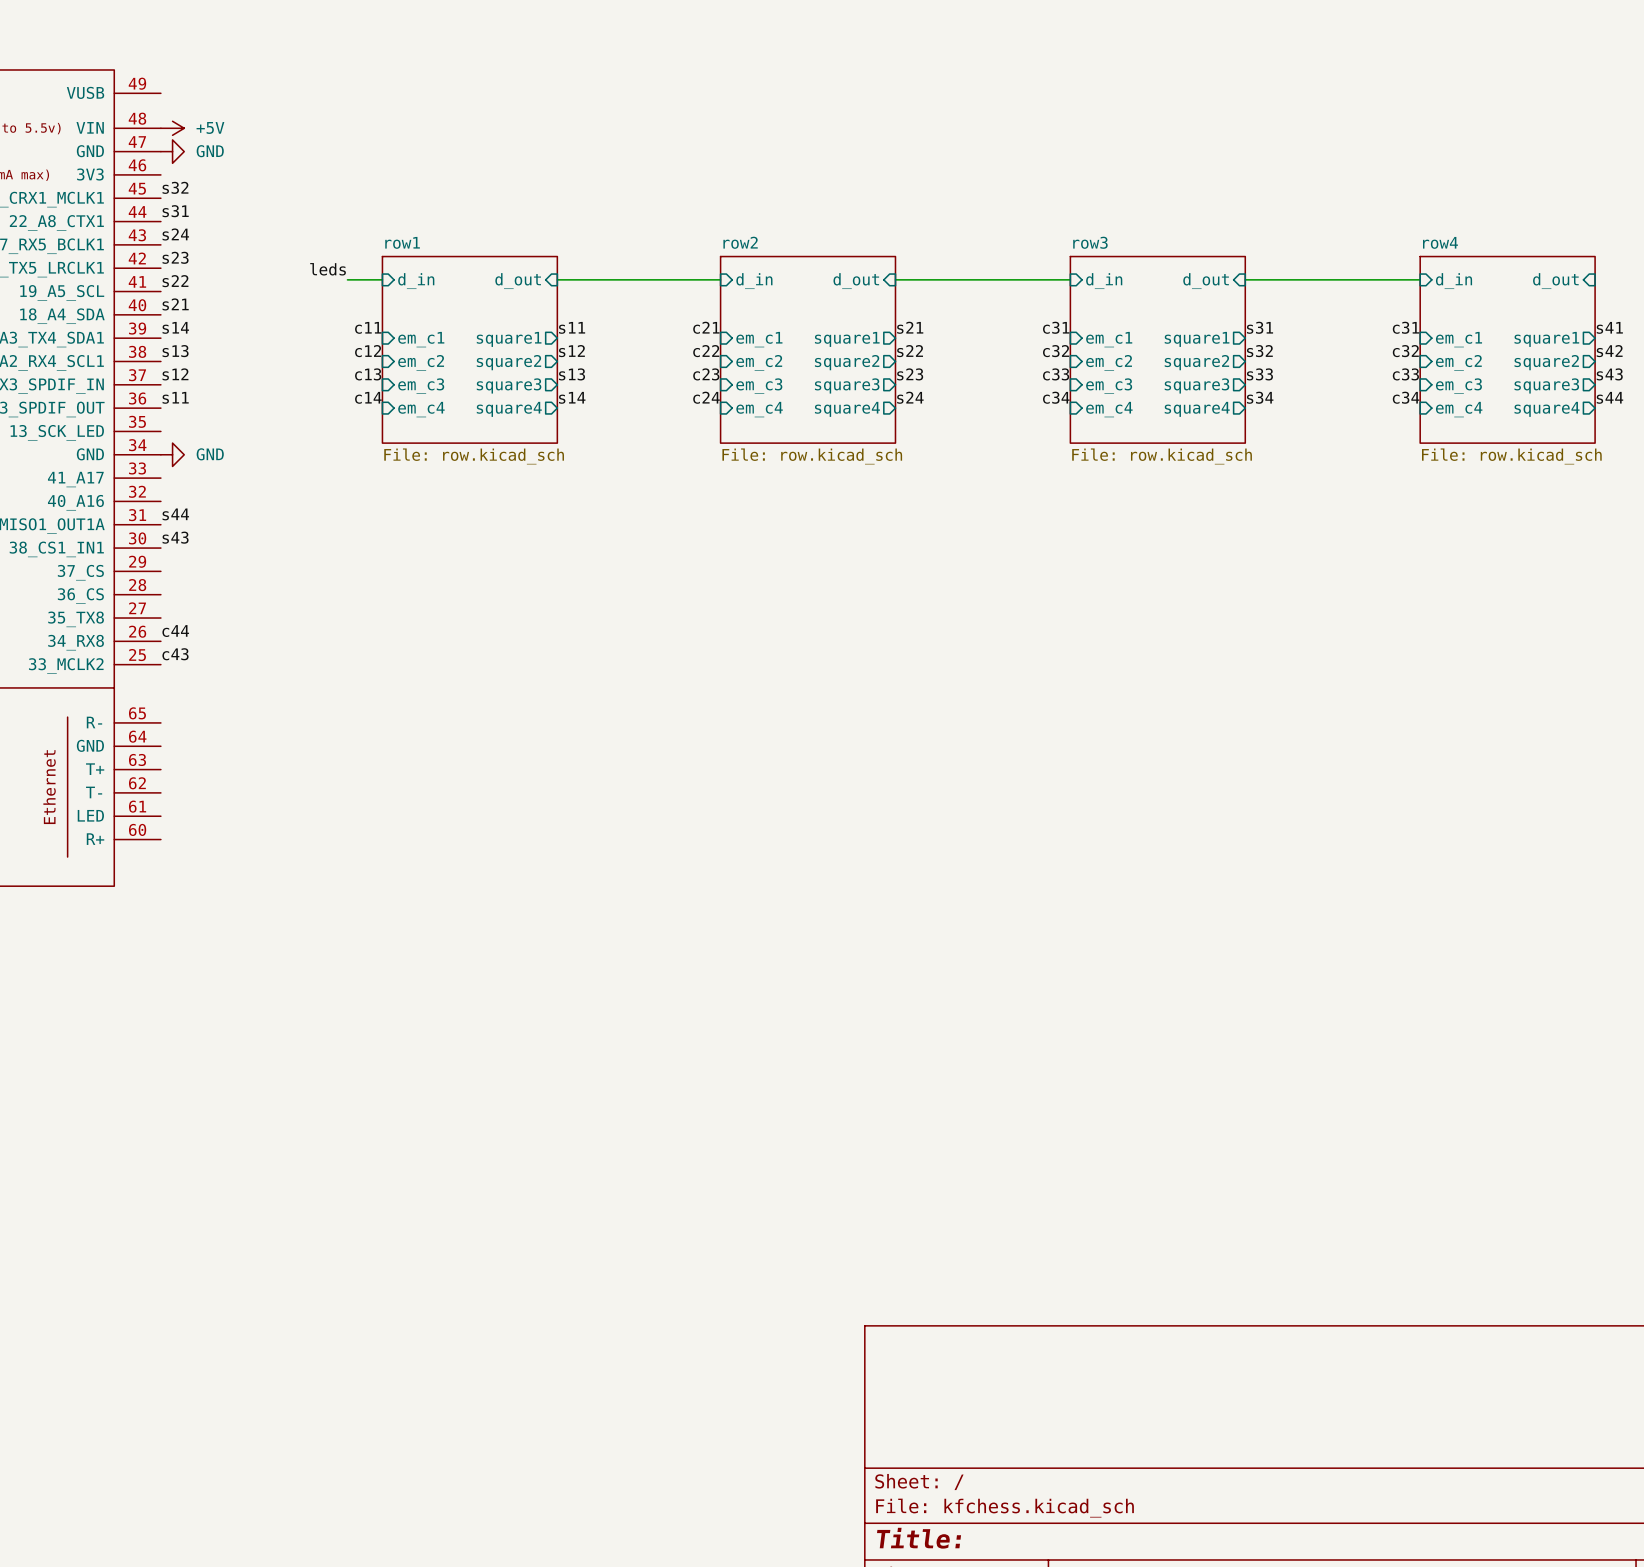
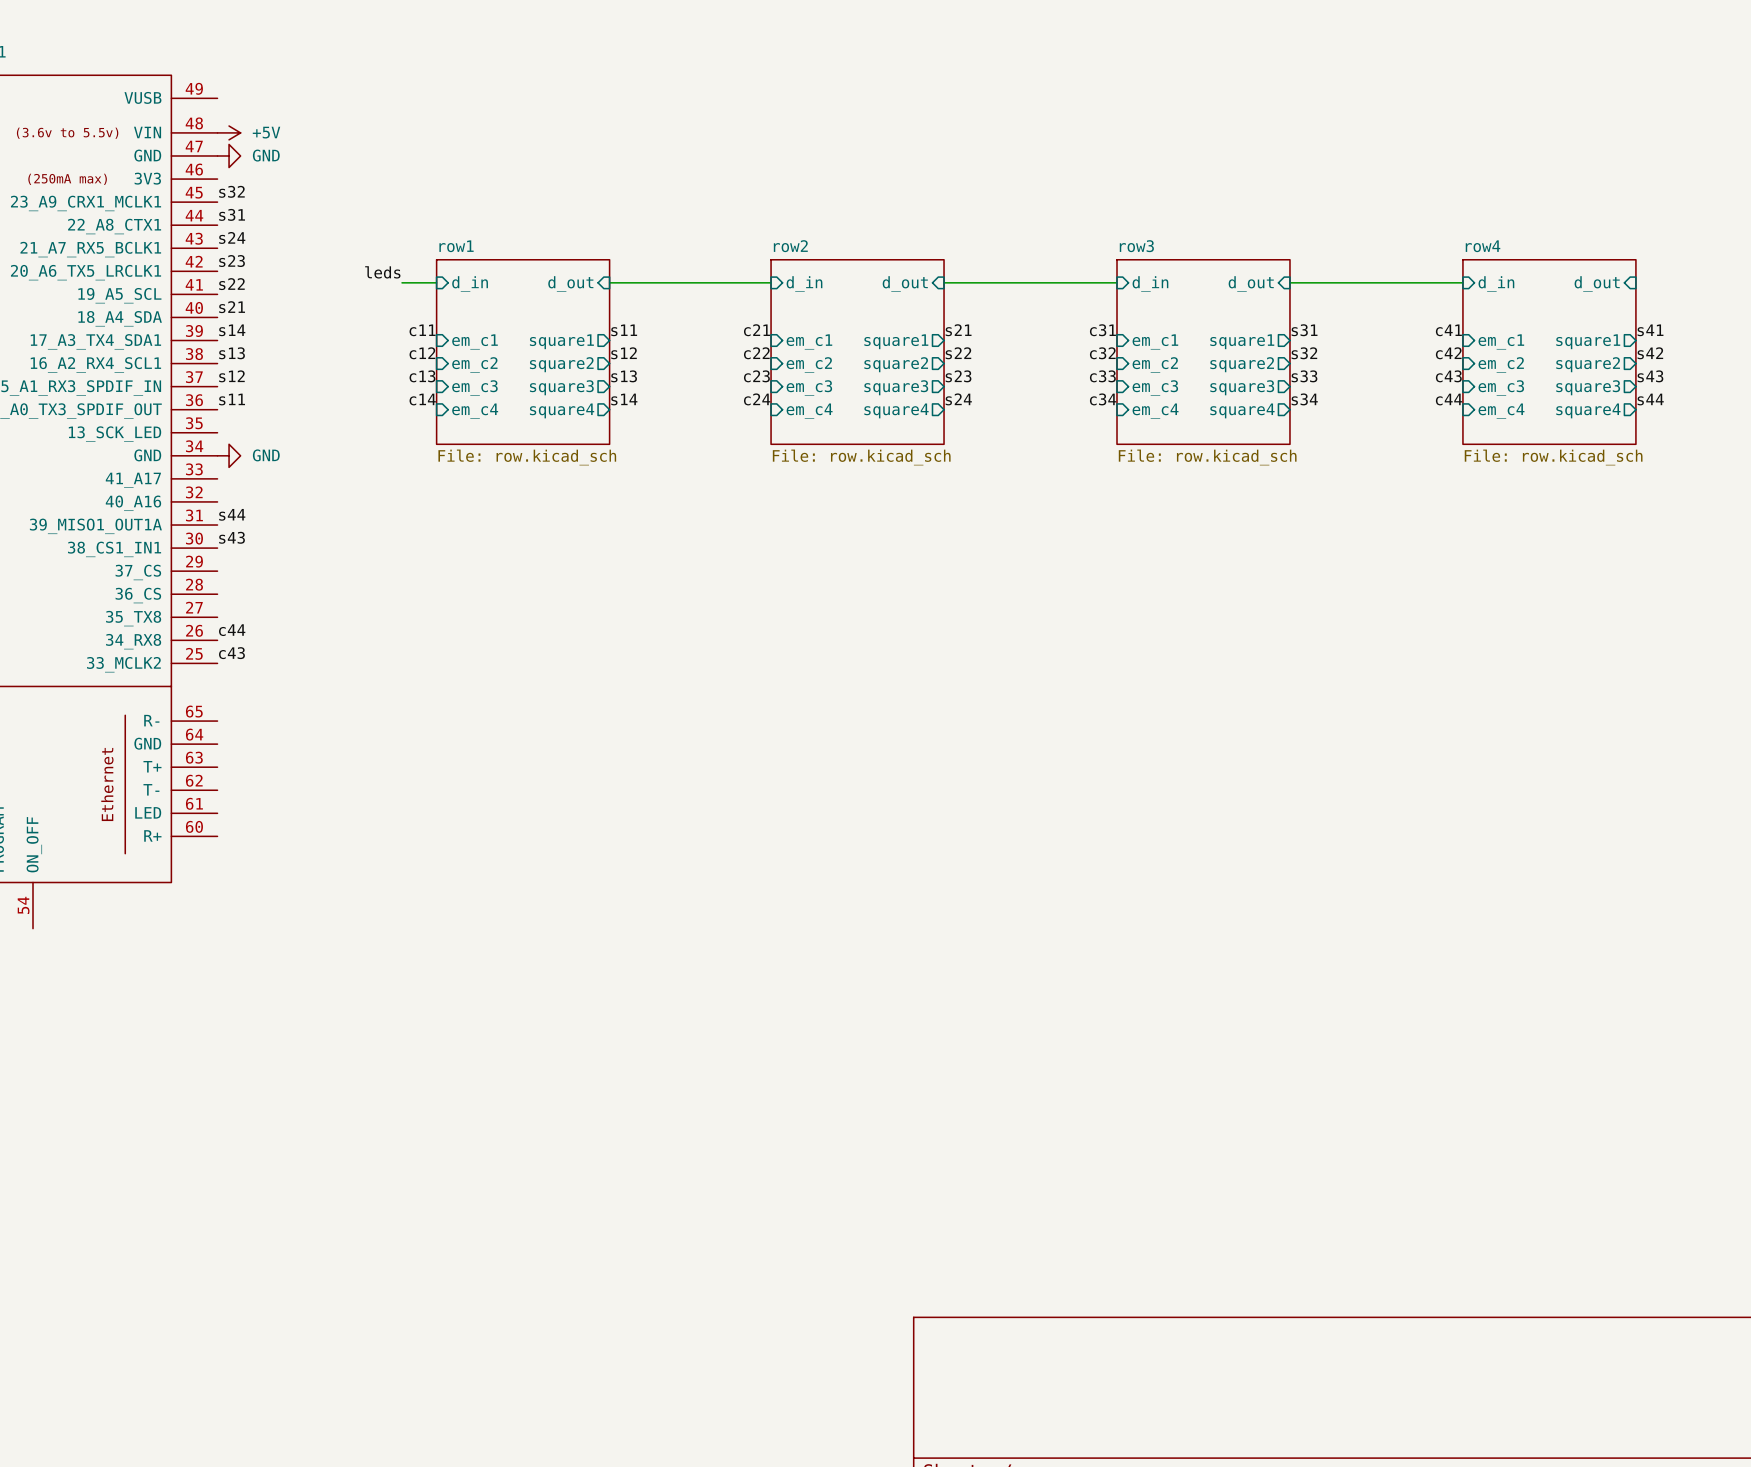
label: c31 (1405, 327) -> c41 (1448, 330)
label: c32 (1405, 351) -> c42 (1448, 353)
label: c33 (1405, 374) -> c43 (1448, 376)
label: c34 (1406, 397) -> c44 (1449, 399)

